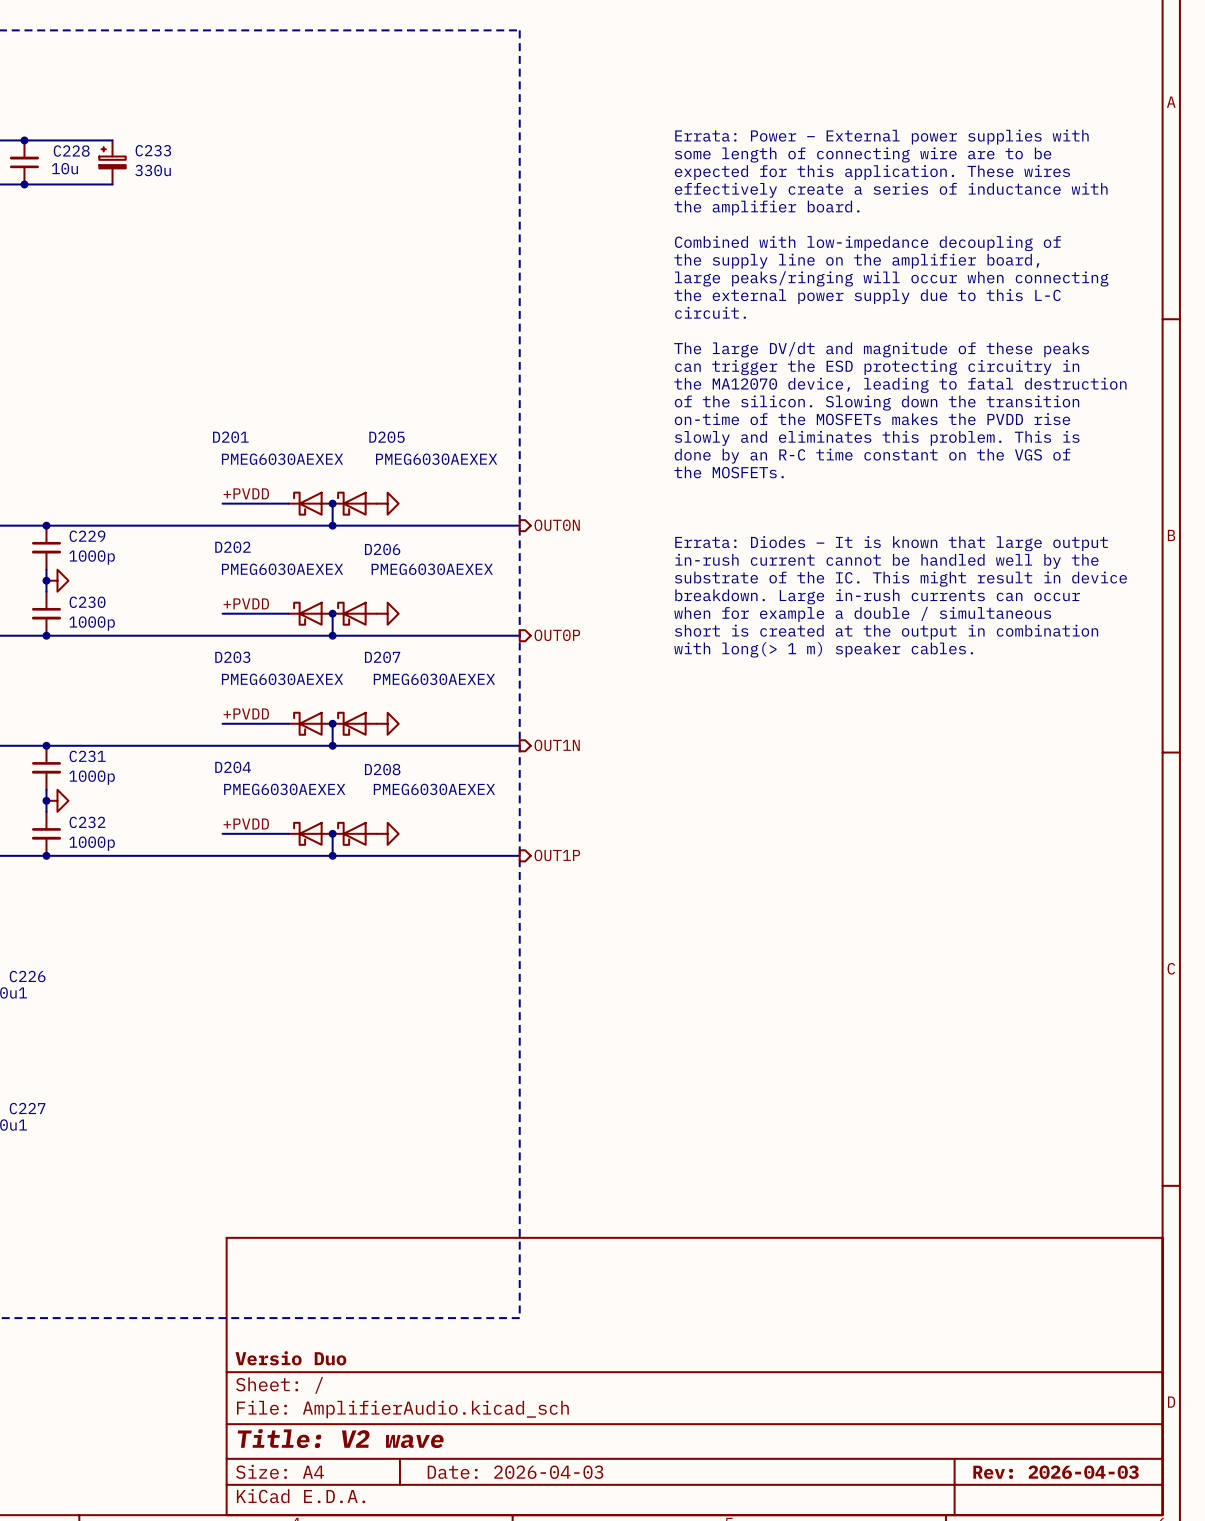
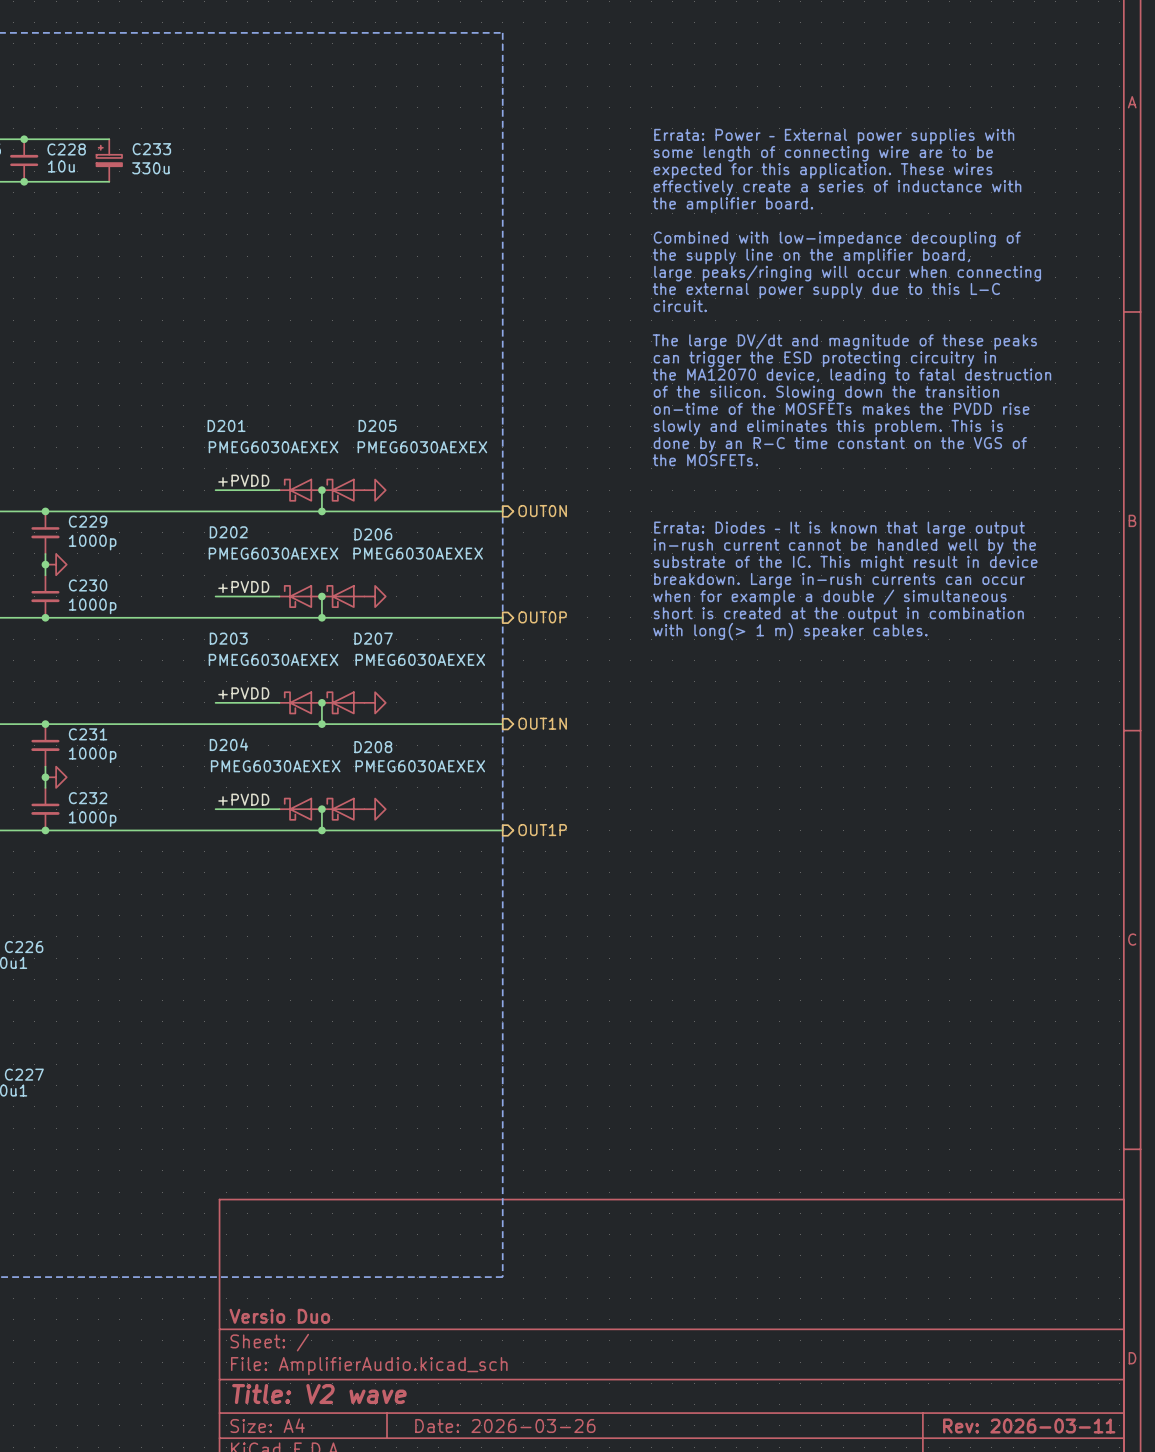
title block: Date: 2026-04-03 (515, 1472) -> Date: 2026-03-26 (505, 1425)
title block: Rev: 2026-04-03 (1056, 1472) -> Rev: 2026-03-11 (1029, 1425)

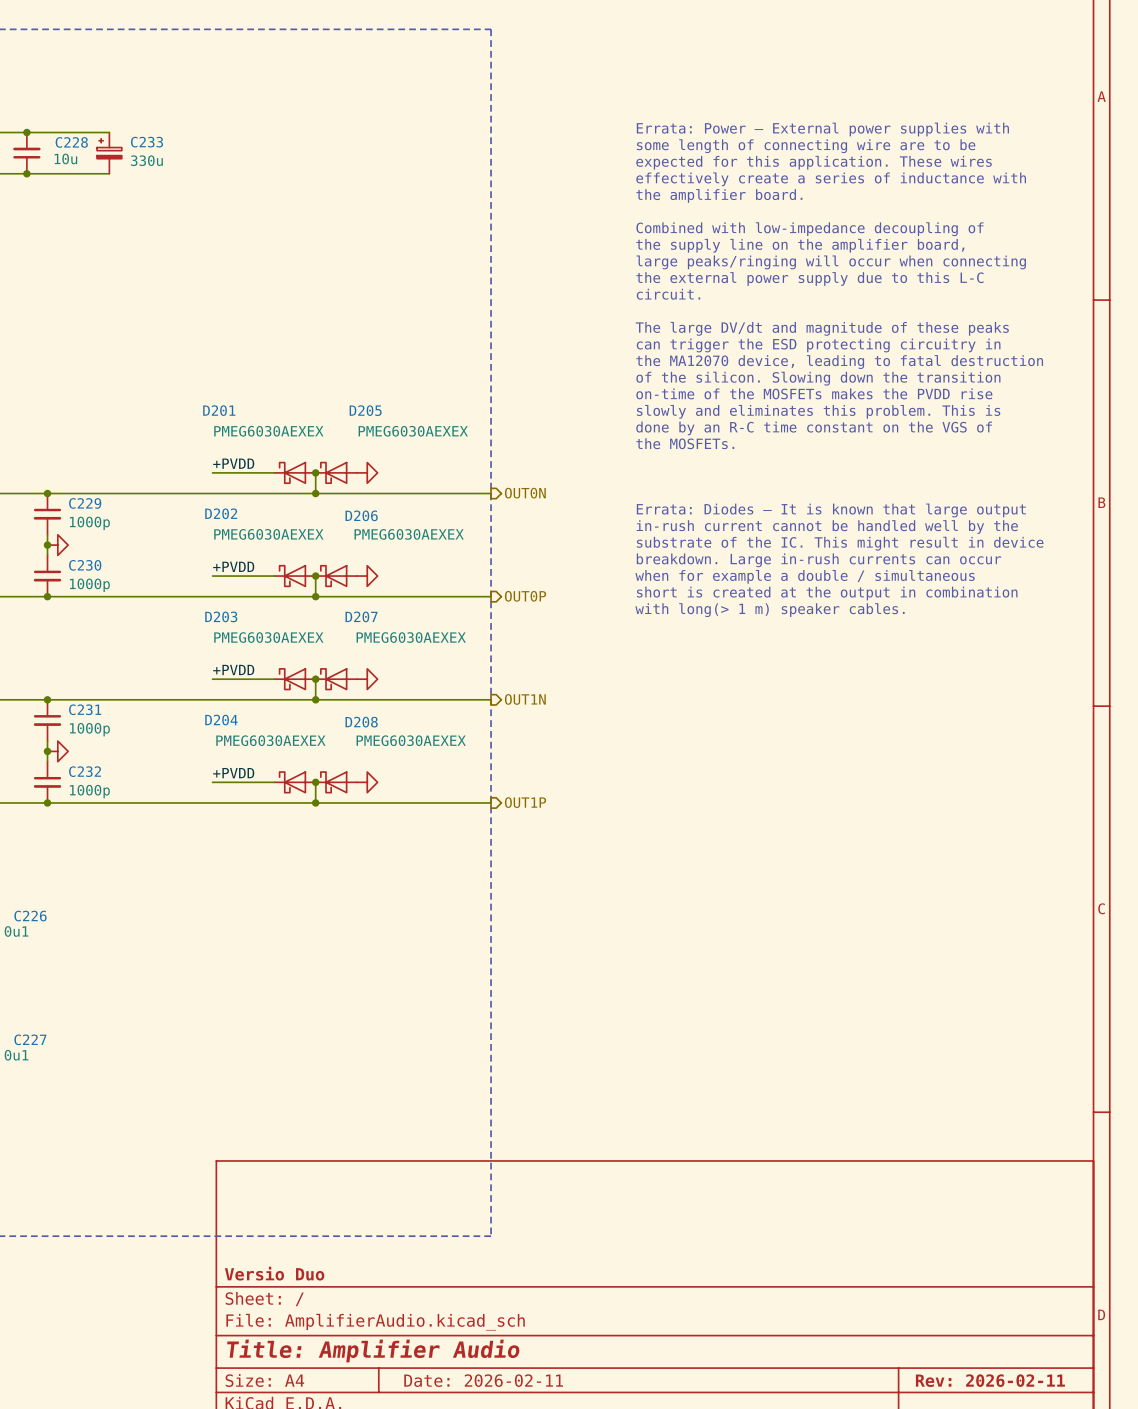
title block: Title: V2 wave (319, 1394) -> Title: Amplifier Audio (373, 1350)
title block: Date: 2026-03-26 (505, 1425) -> Date: 2026-02-11 (483, 1380)
title block: Rev: 2026-03-11 (1029, 1425) -> Rev: 2026-02-11 (990, 1380)

